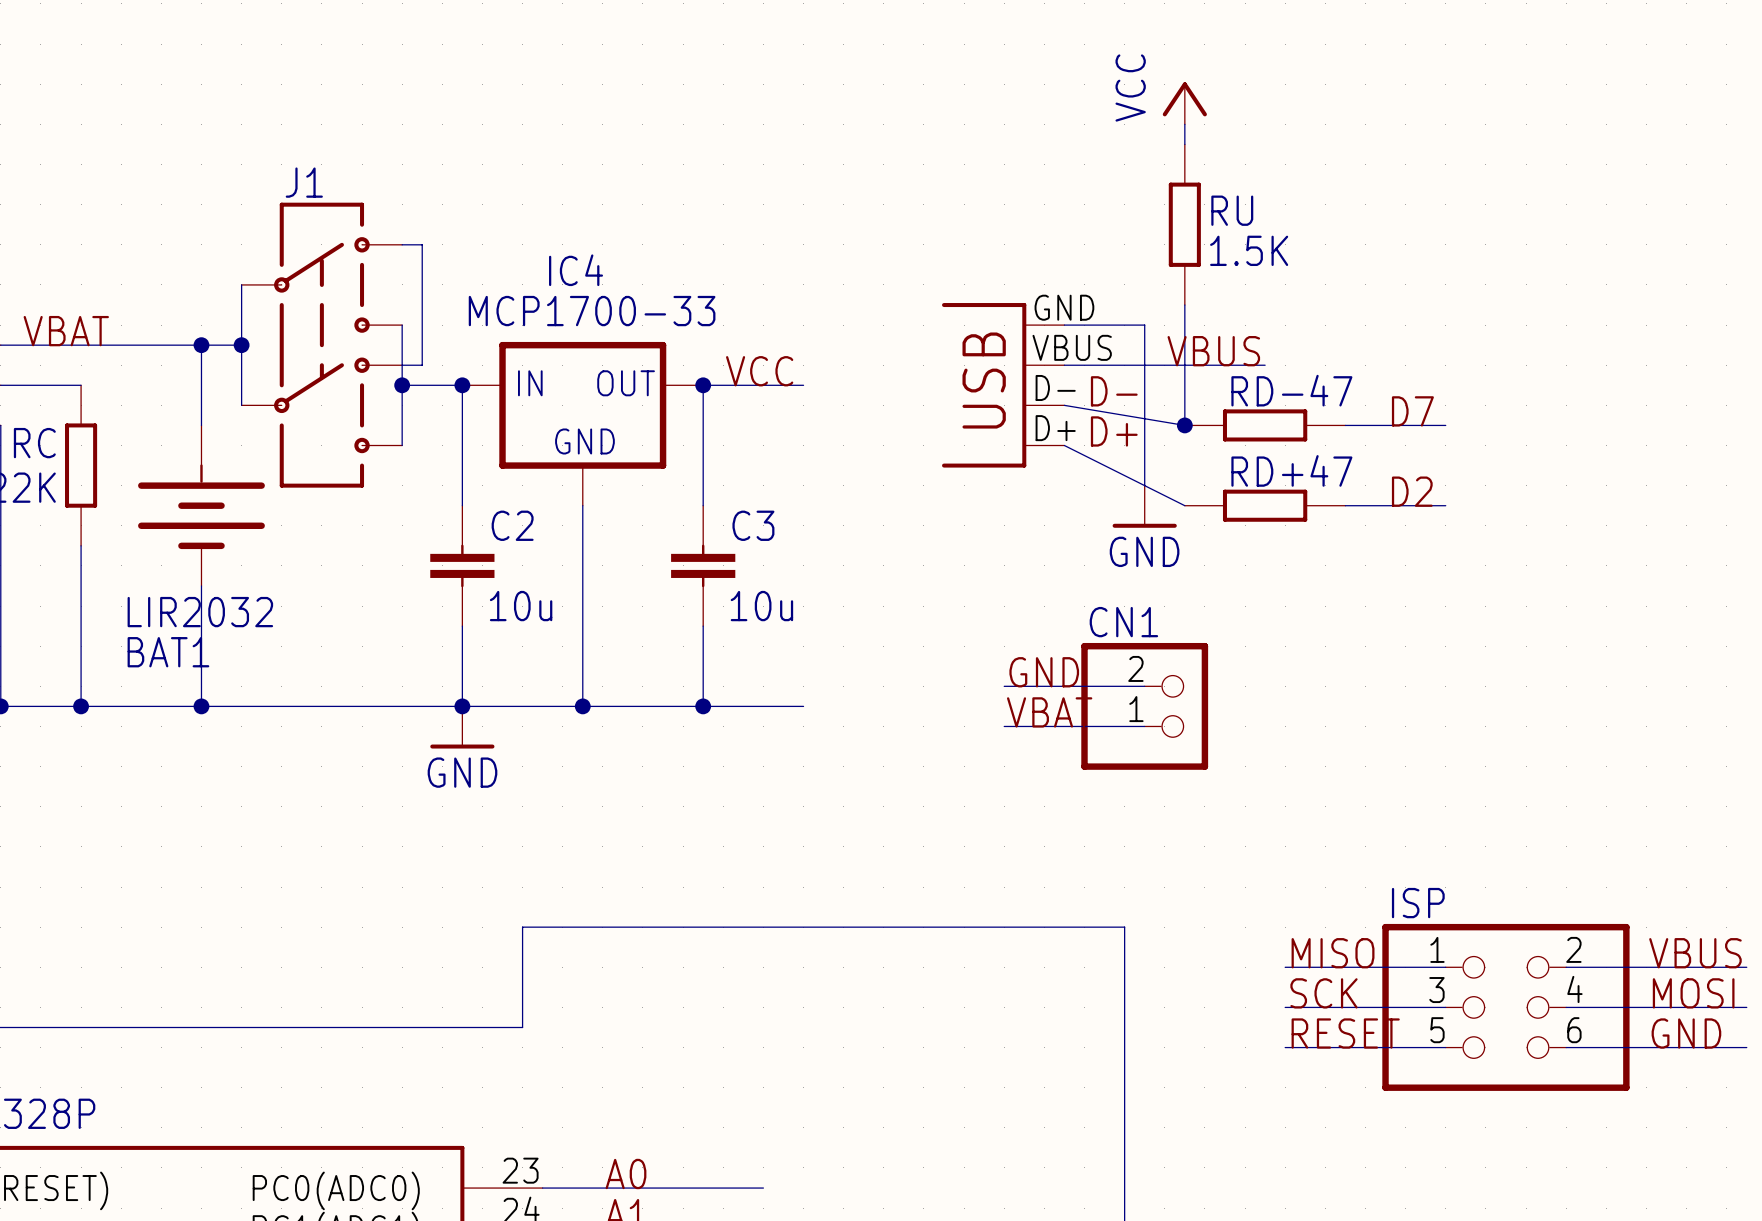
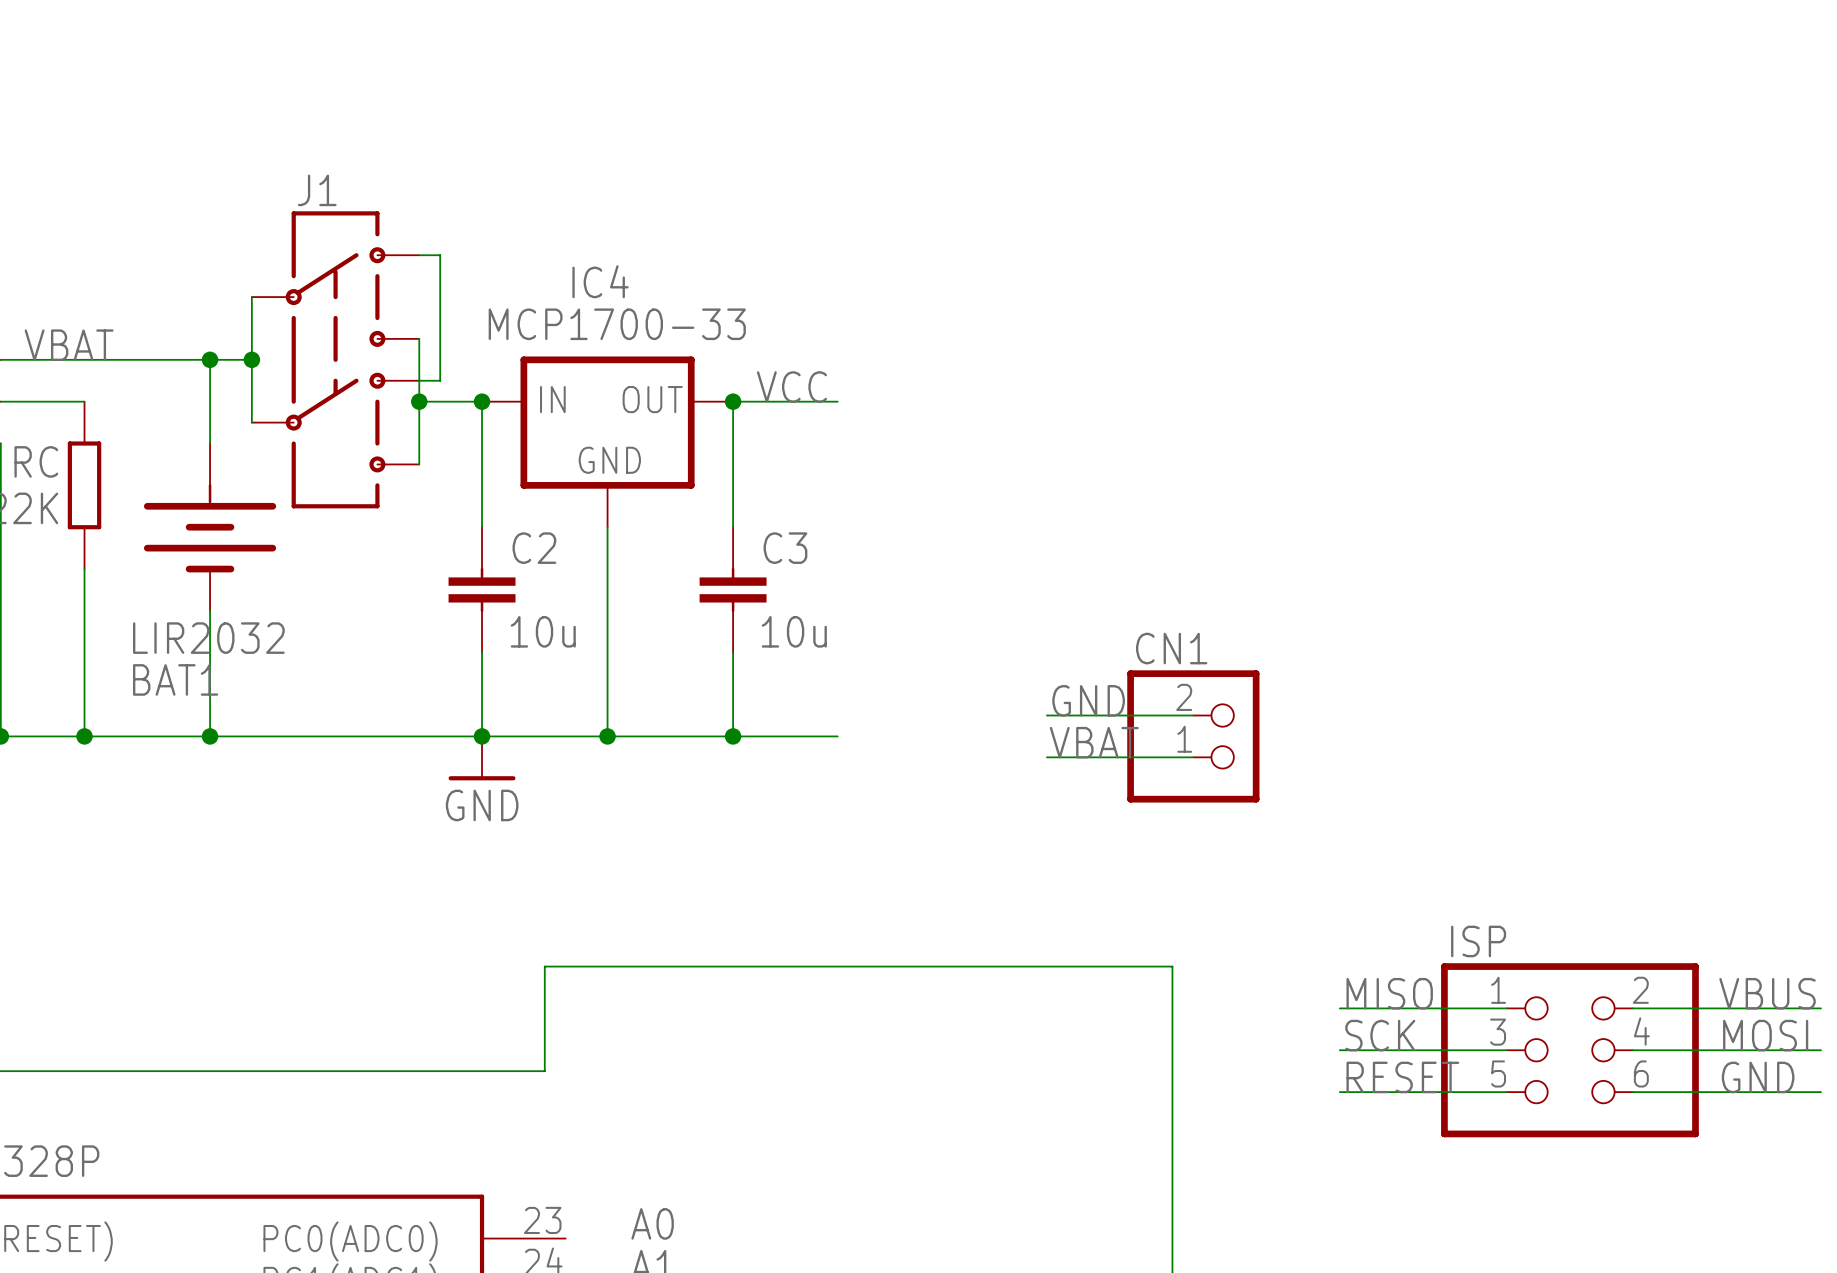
power symbol: VCC (1184, 103) -> none
wire: (1184, 124) (1184, 144) -> none
RU: 1.5K (1184, 224) -> none
wire: (1184, 305) (1184, 425) (1064, 405) -> none
wire: (1064, 325) (1144, 325) (1144, 485) -> none
label: VBUS (1213, 351) -> none
wire: (1064, 365) (1265, 365) -> none
part: (1003, 385) -> none
label: D- (1114, 391) -> none
label: D7 (1412, 411) -> none
junction: (1184, 425) -> none
RD-: 47 (1265, 425) -> none
wire: (1345, 425) (1445, 425) -> none
label: D+ (1114, 431) -> none
wire: (1064, 445) (1184, 505) -> none
label: D2 (1412, 491) -> none
RD+: 47 (1265, 505) -> none
wire: (1345, 505) (1445, 505) -> none
power symbol: GND (1144, 506) -> none
wire: (542, 1188) (763, 1188) -> none

